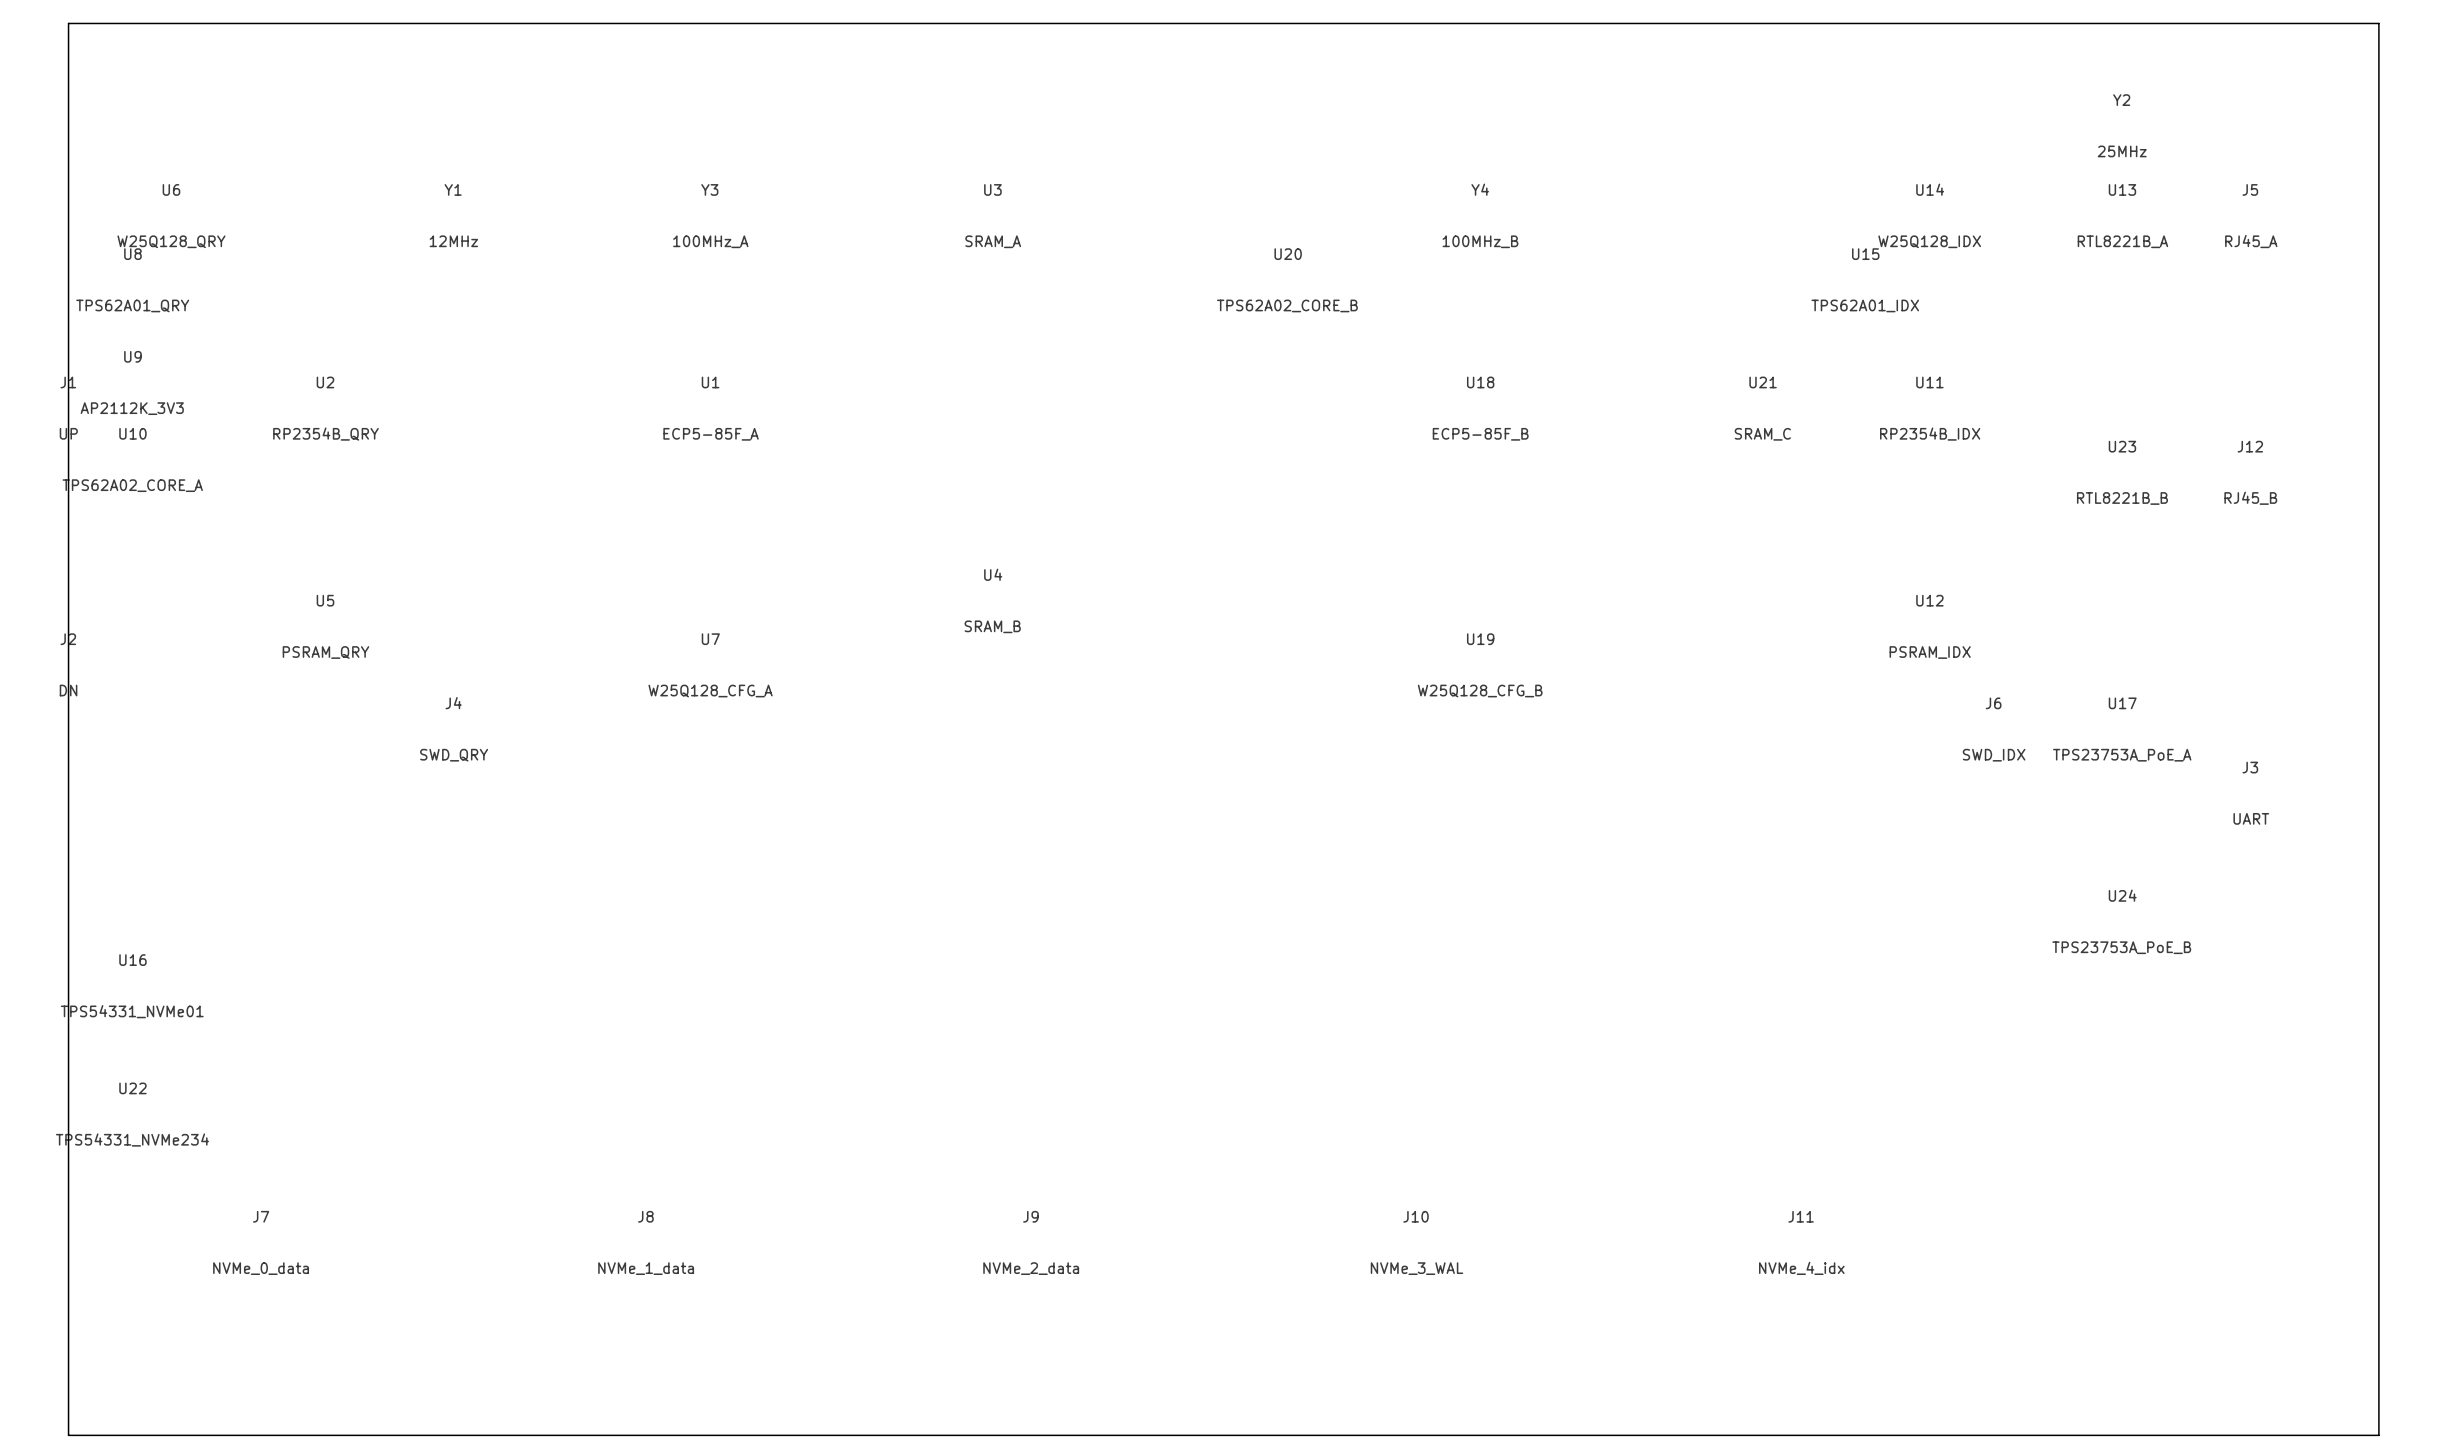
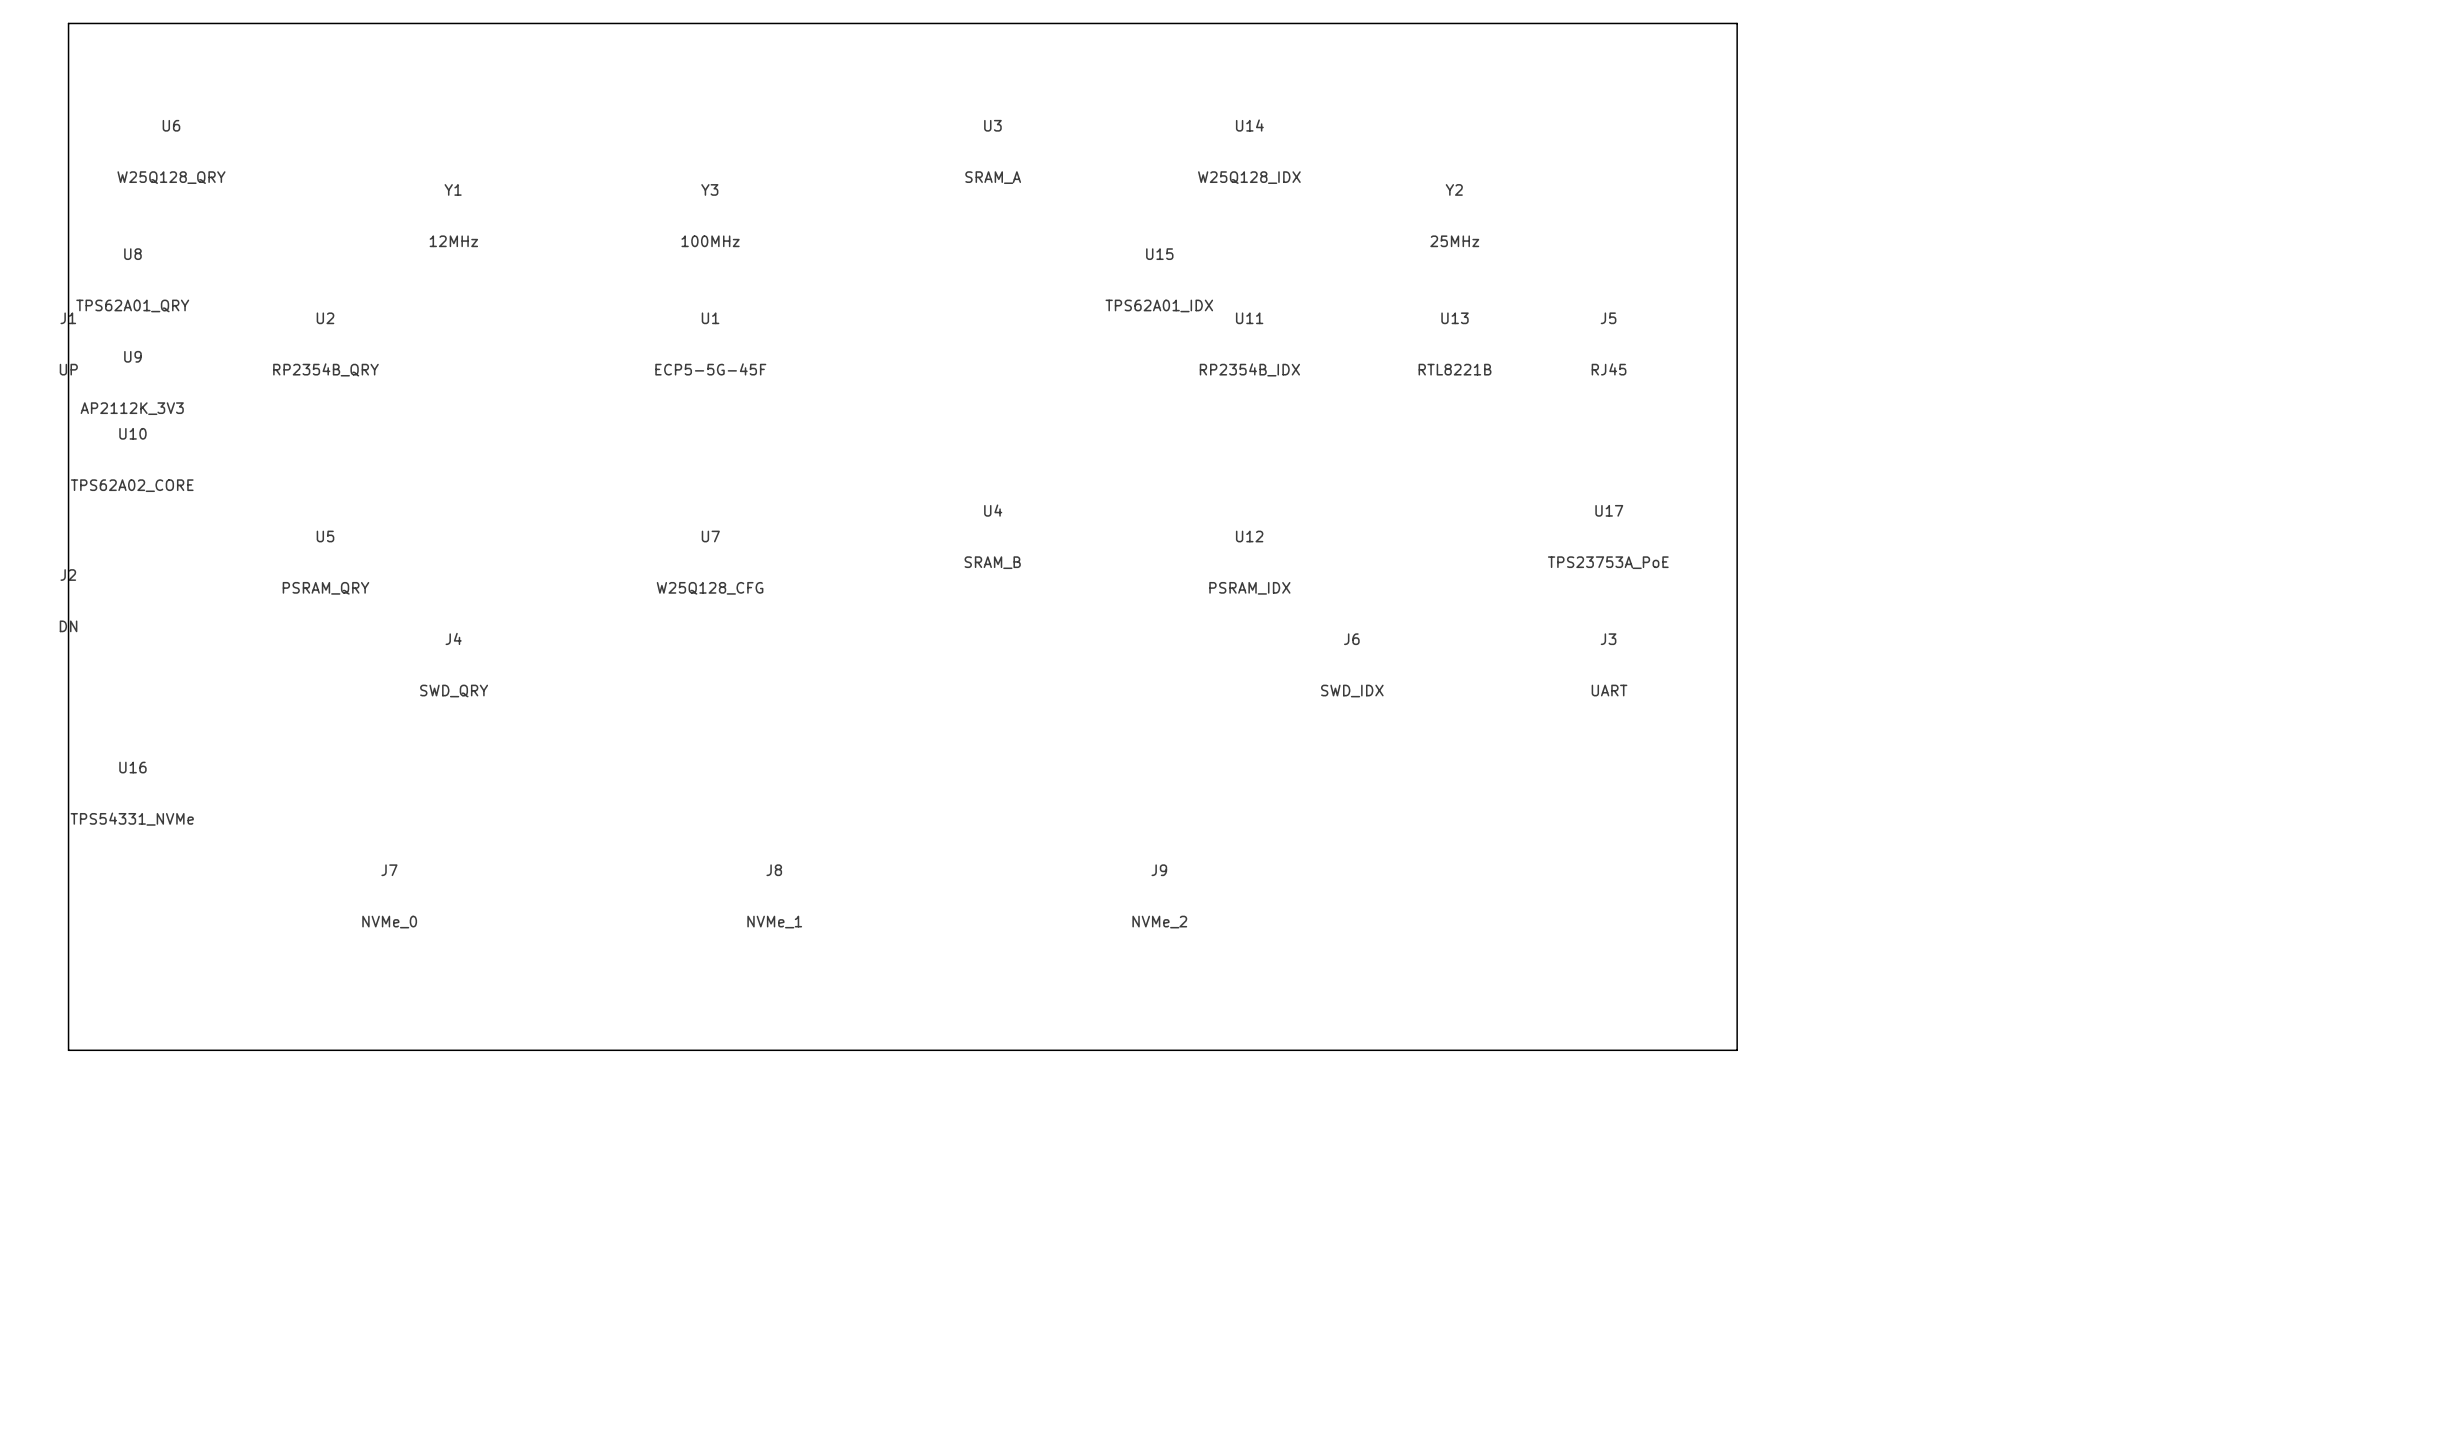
board edge: (1737, 23) (2378, 23) (2378, 1435) (68, 1435) (68, 1050) -> (1737, 23) (1737, 1050) (68, 1050)
Y2 position: (2122, 125) -> (1454, 215)
Y4: 100MHz_B (1480, 215) -> none
U14 position: (1929, 215) -> (1249, 151)
U6 position: (171, 216) -> (171, 151)
U3 position: (993, 216) -> (993, 151)
U13 position: (2122, 216) -> (1455, 343)
J5 position: (2251, 216) -> (1609, 343)
Y3 value: 100MHz_A (710, 241) -> 100MHz (710, 241)
U13 value: RTL8221B_A (2122, 241) -> RTL8221B (1455, 369)
J5 value: RJ45_A (2251, 241) -> RJ45 (1609, 369)
U20: TPS62A02_CORE_B (1287, 280) -> none
U15 position: (1865, 280) -> (1159, 280)
J1 position: (68, 408) -> (68, 343)
U2 position: (325, 408) -> (325, 344)
U1 position: (711, 408) -> (710, 343)
U18: ECP5-85F_B (1480, 408) -> none
U21: SRAM_C (1762, 408) -> none
U11 position: (1930, 408) -> (1249, 344)
U1 value: ECP5-85F_A (711, 434) -> ECP5-5G-45F (710, 369)
U23: RTL8221B_B (2122, 472) -> none
J12: RJ45_B (2250, 472) -> none
U10 value: TPS62A02_CORE_A (132, 485) -> TPS62A02_CORE (132, 485)
U4 position: (992, 600) -> (992, 536)
U5 position: (325, 626) -> (325, 562)
U12 position: (1930, 626) -> (1249, 562)
J2 position: (68, 664) -> (68, 600)
U7 position: (710, 665) -> (710, 562)
U19: W25Q128_CFG_B (1480, 665) -> none
U7 value: W25Q128_CFG_A (710, 691) -> W25Q128_CFG (710, 588)
J4 position: (454, 729) -> (454, 665)
J6 position: (1994, 729) -> (1352, 665)
U17 position: (2122, 729) -> (1608, 536)
U17 value: TPS23753A_PoE_A (2122, 755) -> TPS23753A_PoE (1608, 562)
J3 position: (2251, 793) -> (1609, 664)
U24: TPS23753A_PoE_B (2121, 921) -> none
U16 position: (132, 986) -> (132, 793)
U16 value: TPS54331_NVMe01 (132, 1011) -> TPS54331_NVMe (132, 819)
U22: TPS54331_NVMe234 (132, 1114) -> none
J7 position: (261, 1242) -> (389, 896)
J8 position: (646, 1242) -> (774, 896)
J9 position: (1031, 1242) -> (1159, 896)
J10: NVMe_3_WAL (1416, 1242) -> none
J11: NVMe_4_idx (1801, 1242) -> none
J7 value: NVMe_0_data (261, 1268) -> NVMe_0 (389, 922)
J8 value: NVMe_1_data (646, 1268) -> NVMe_1 (774, 922)
J9 value: NVMe_2_data (1031, 1268) -> NVMe_2 (1159, 922)

